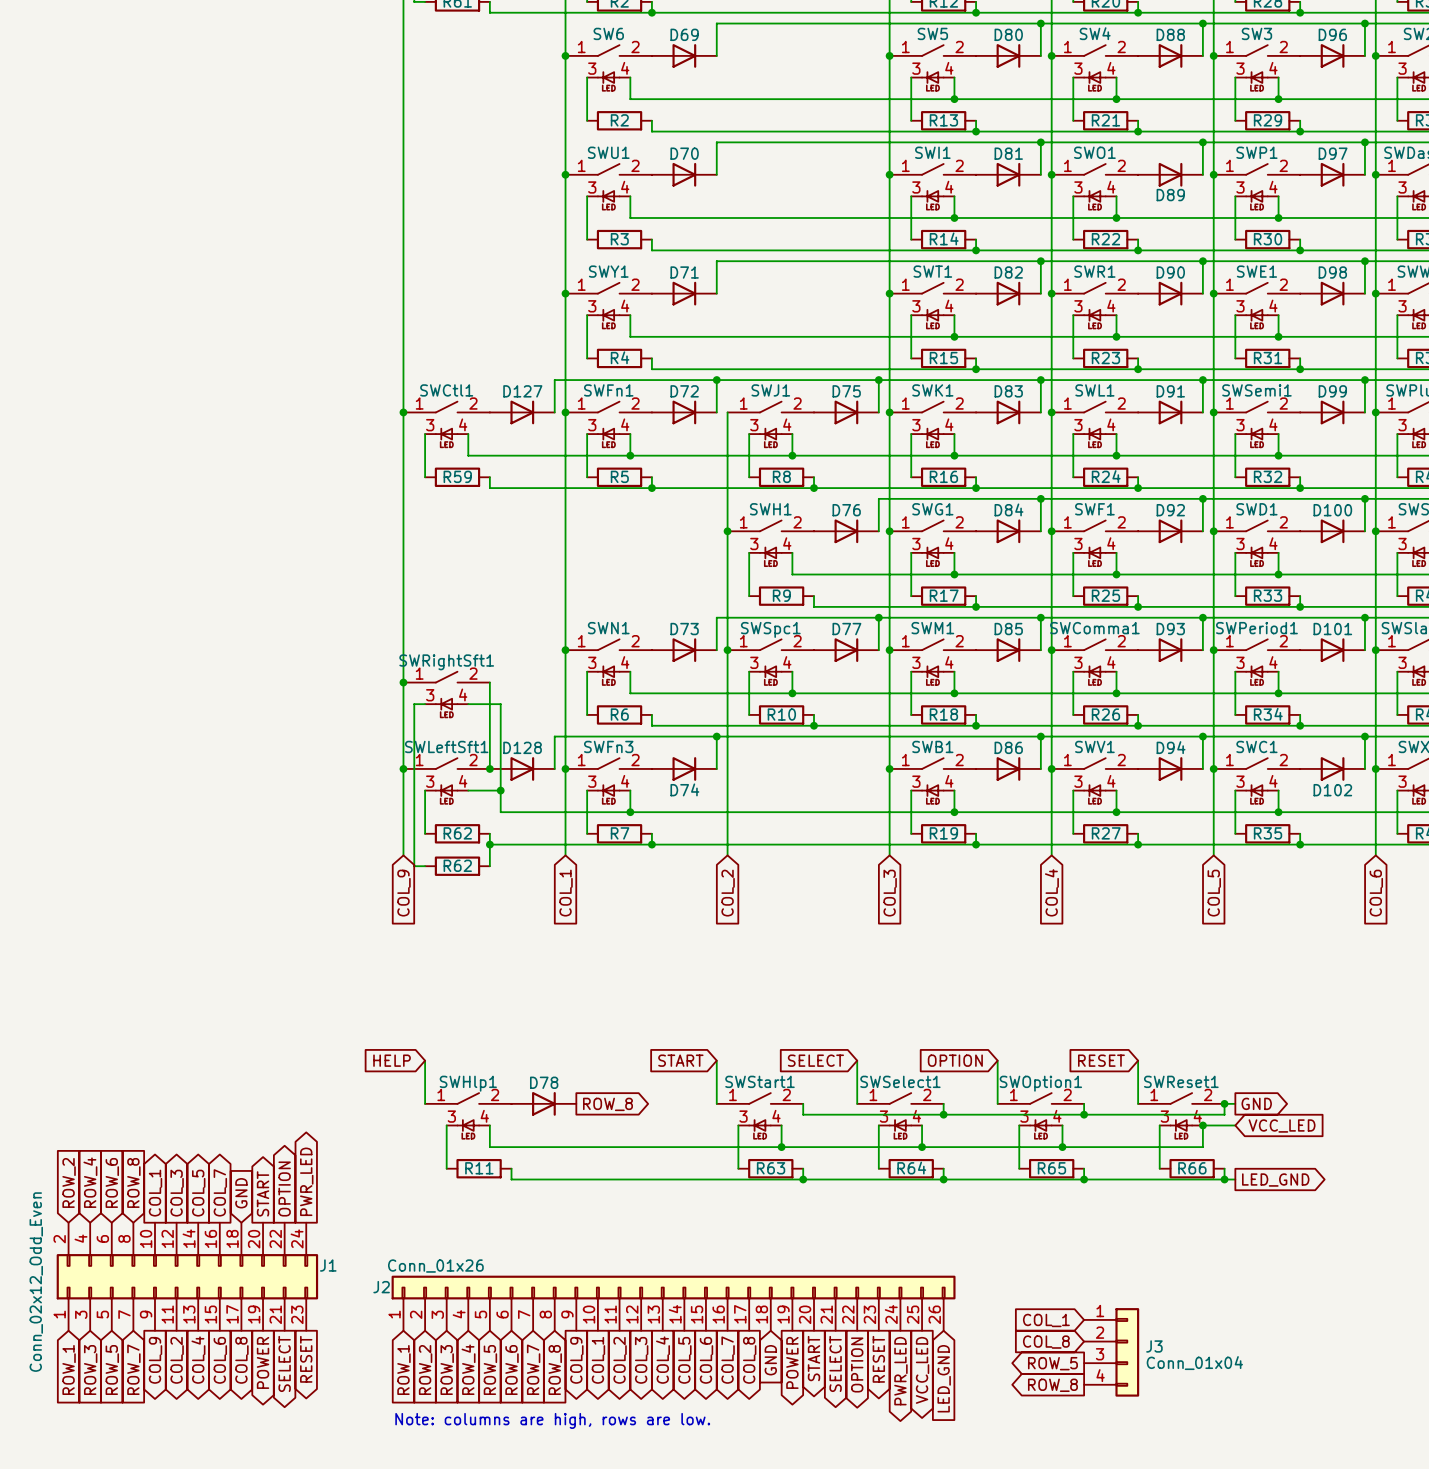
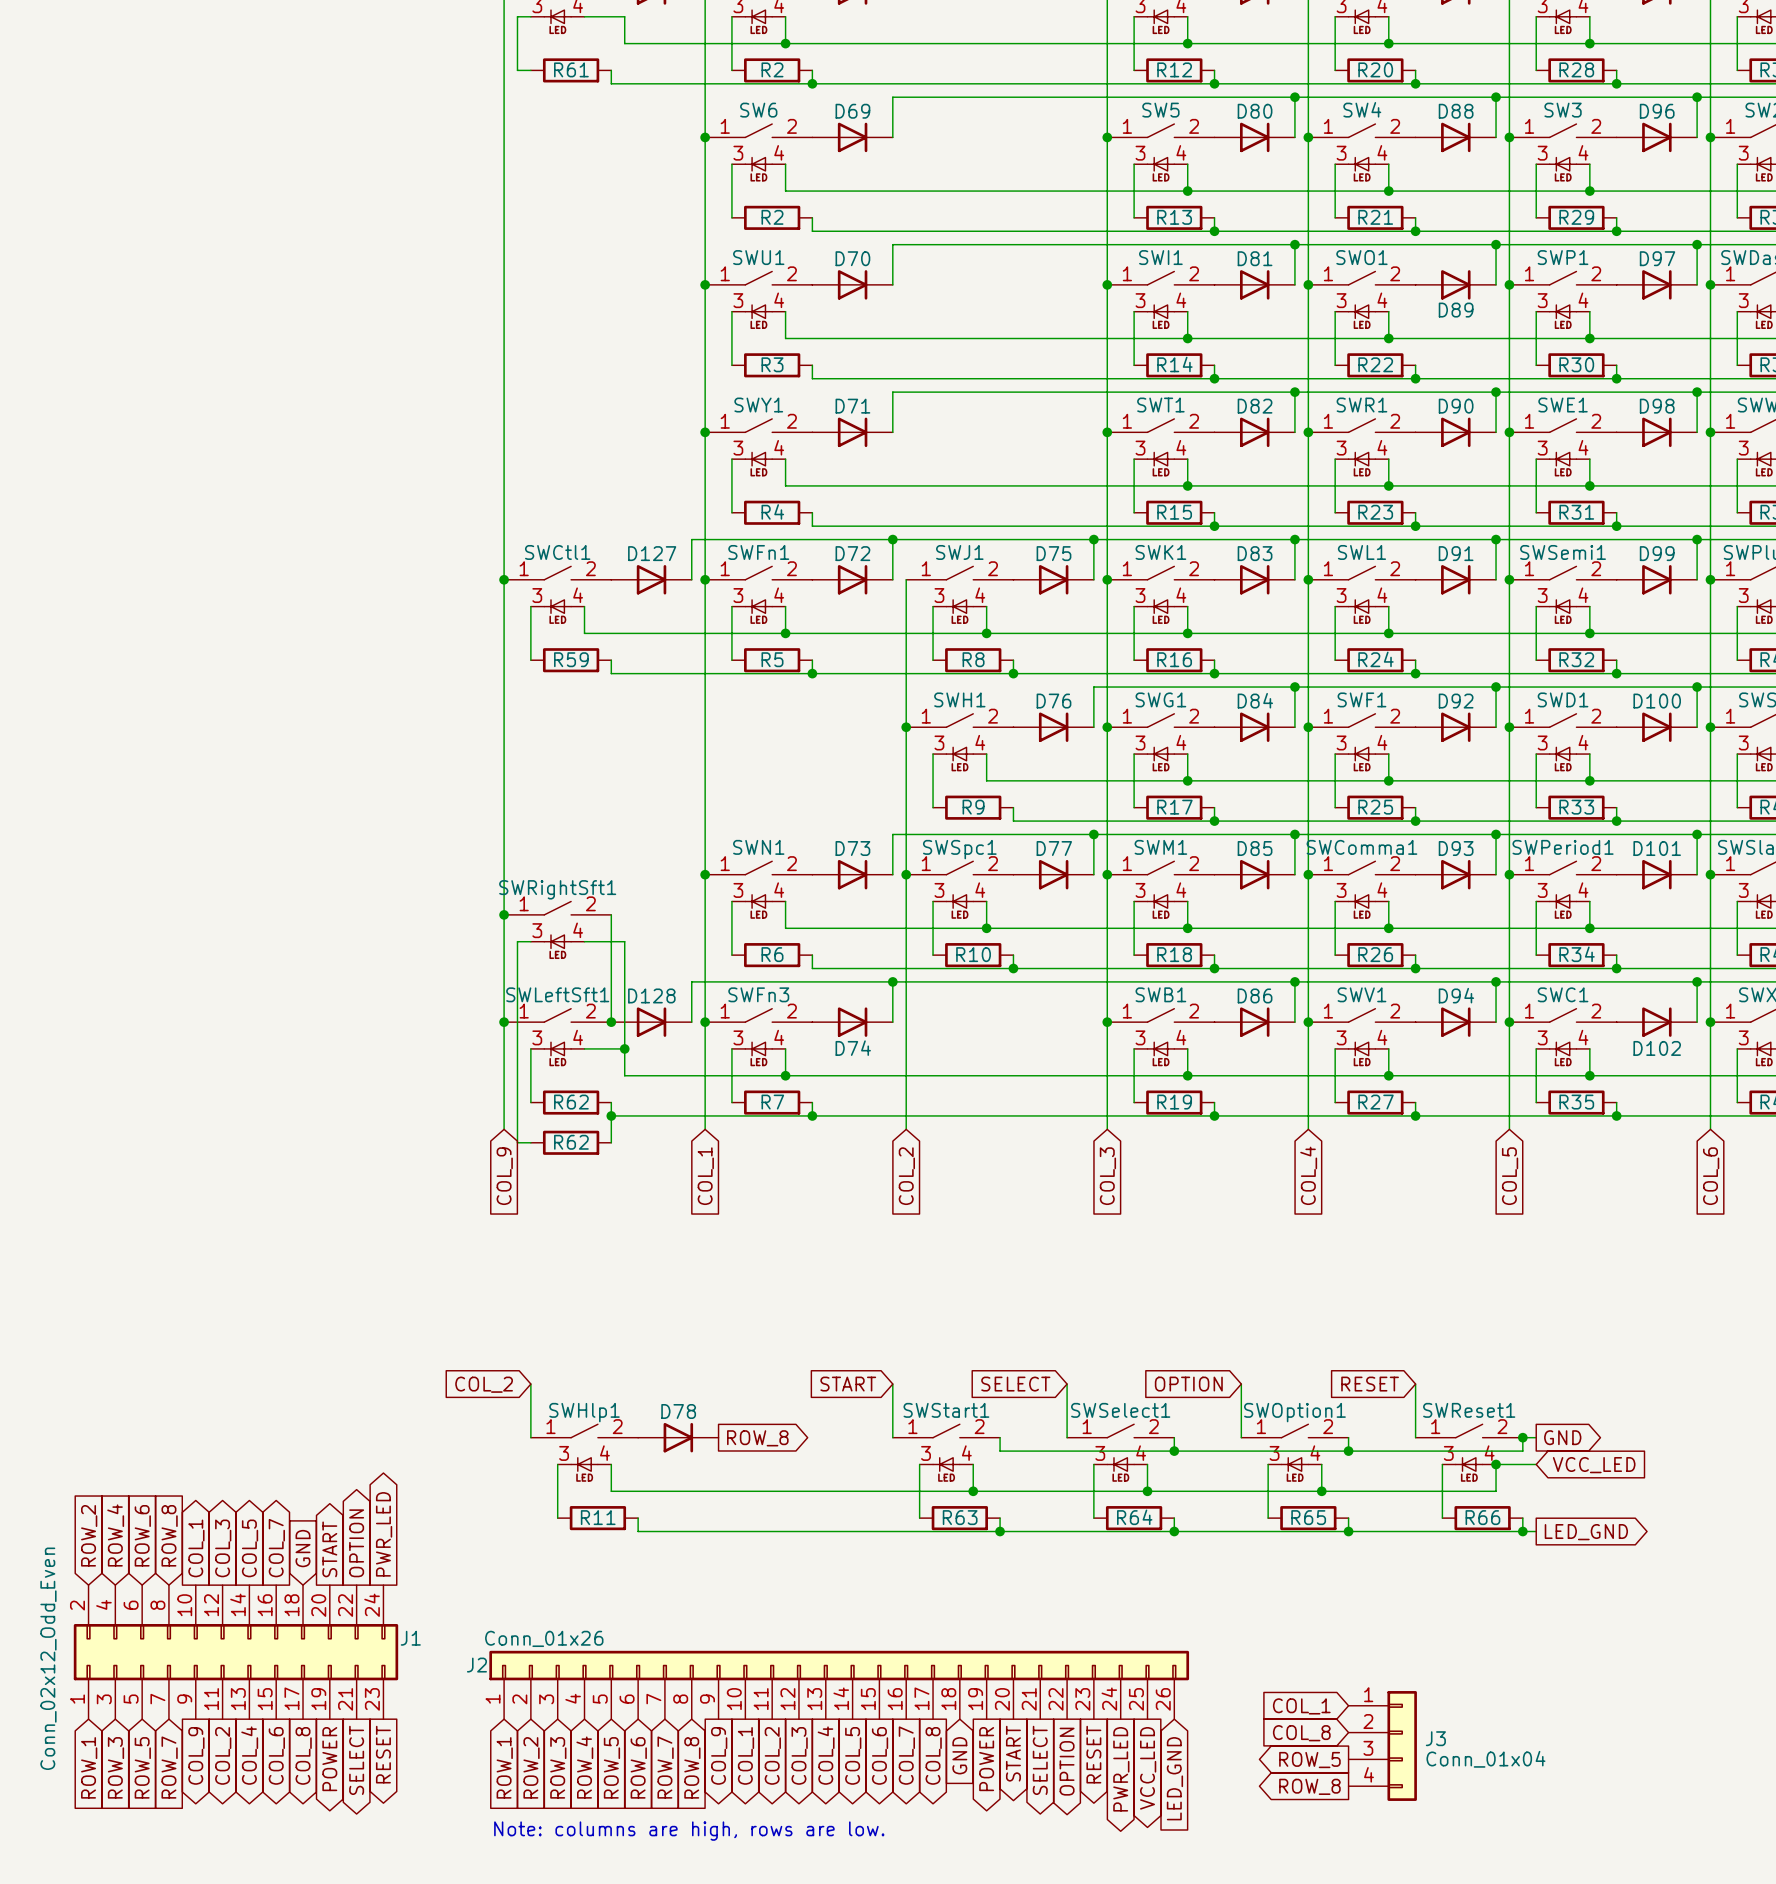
global label: HELP (392, 1060) -> COL_2 (484, 1384)

